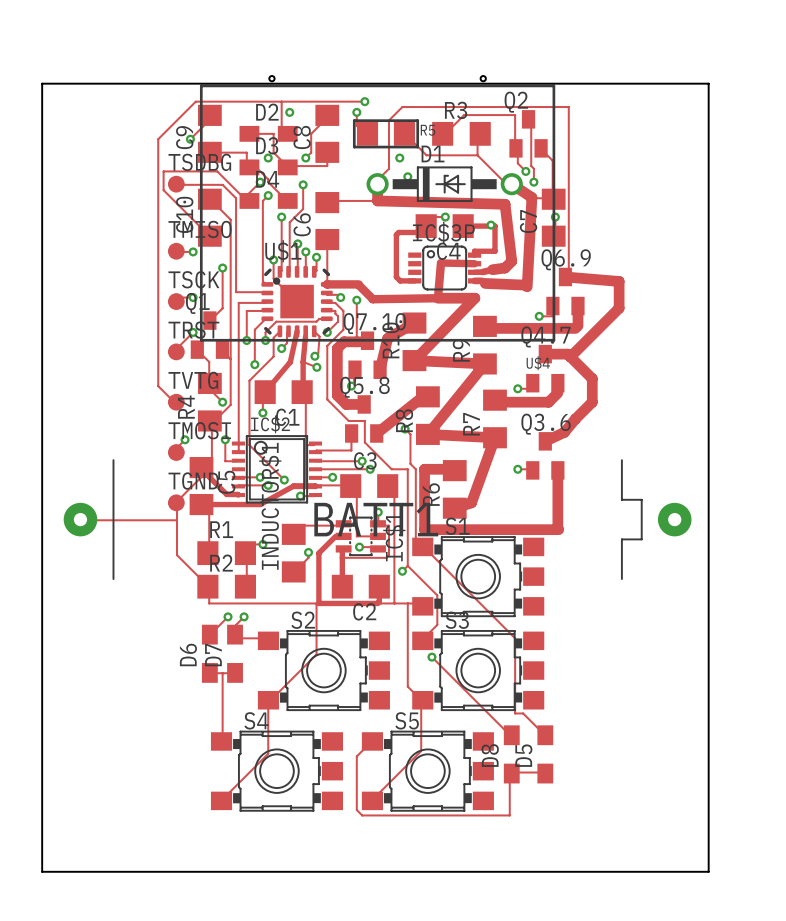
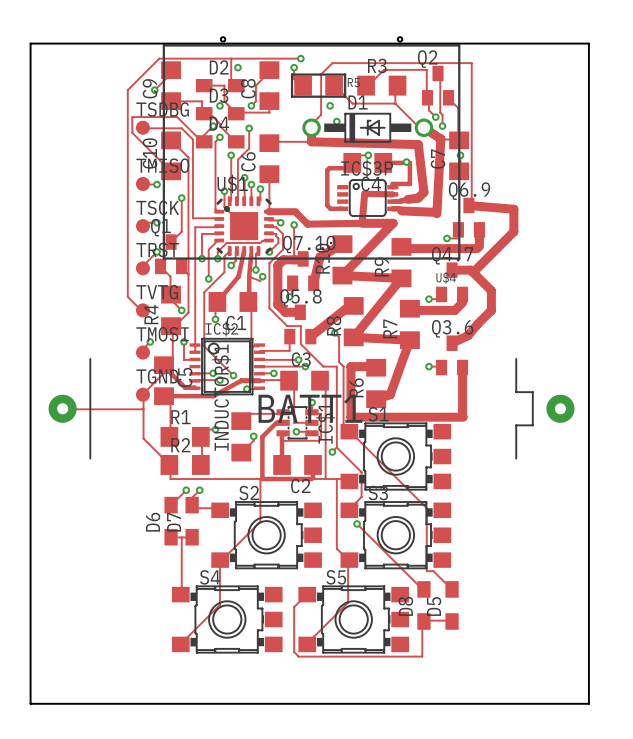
track: (314, 331) (319, 336) (318, 353) (314, 356) -> none
track: none -> (258, 251) (255, 254) (255, 269)
via: none -> (255, 269)
via: (314, 356) -> none
via: none -> (262, 276)
via: (316, 367) -> none

